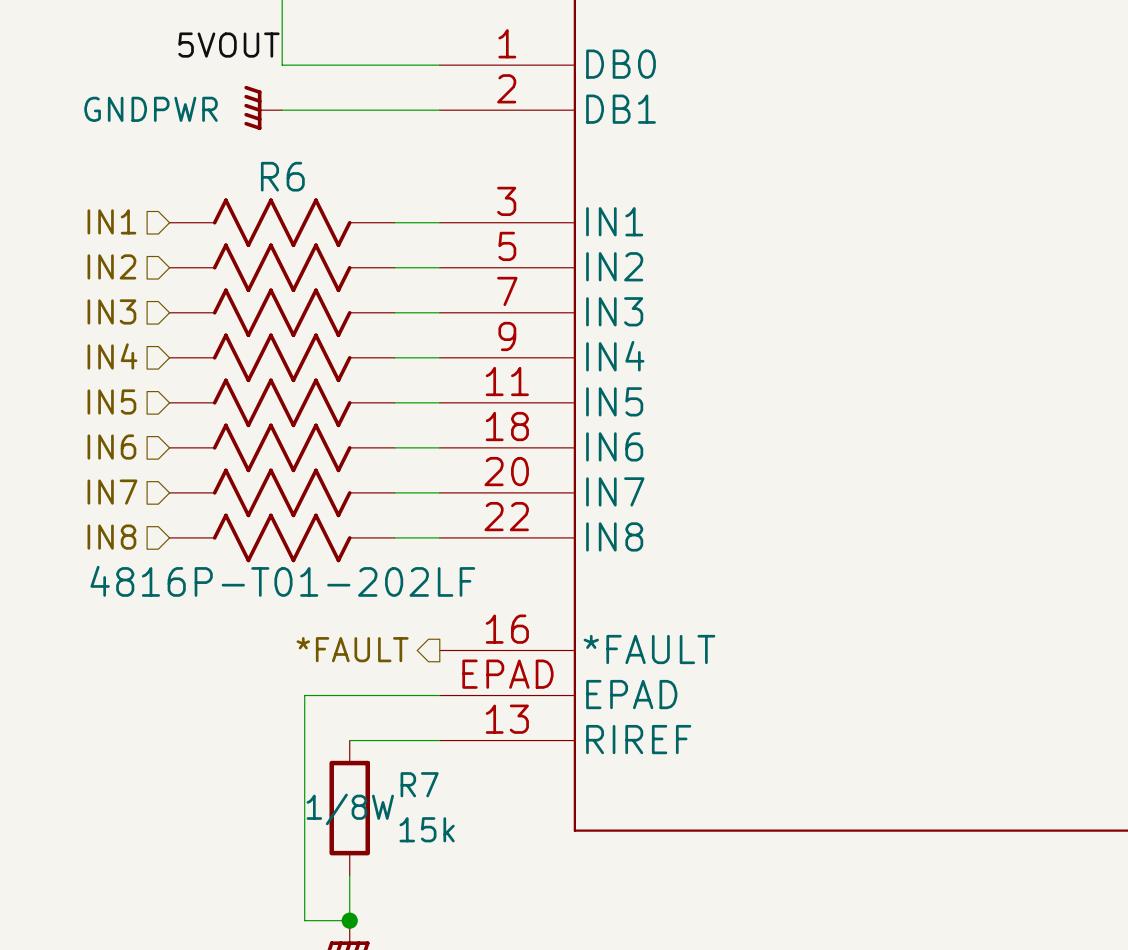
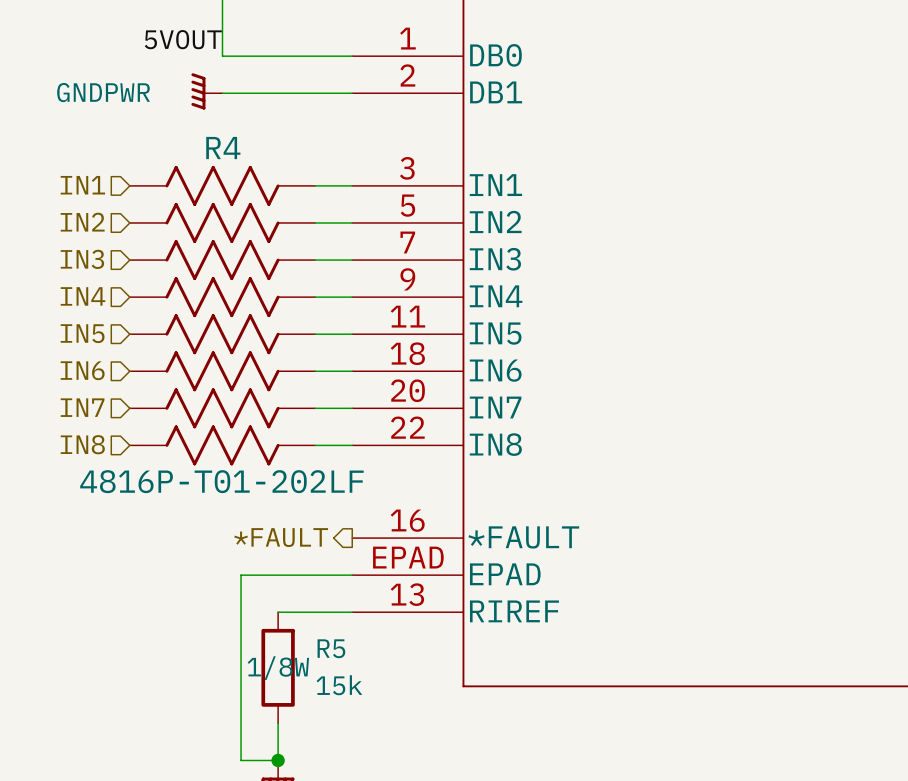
R6 name: R6 (282, 176) -> R4 (223, 148)
R7 name: R7 (419, 784) -> R5 (331, 648)

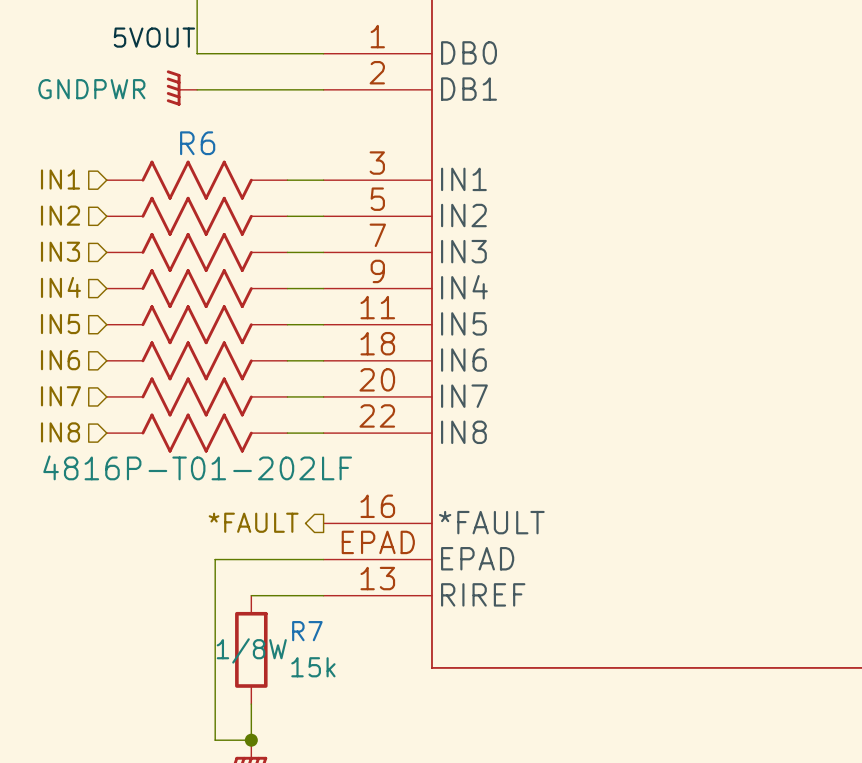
R4 name: R4 (223, 148) -> R6 (197, 143)
R5 name: R5 (331, 648) -> R7 (307, 631)

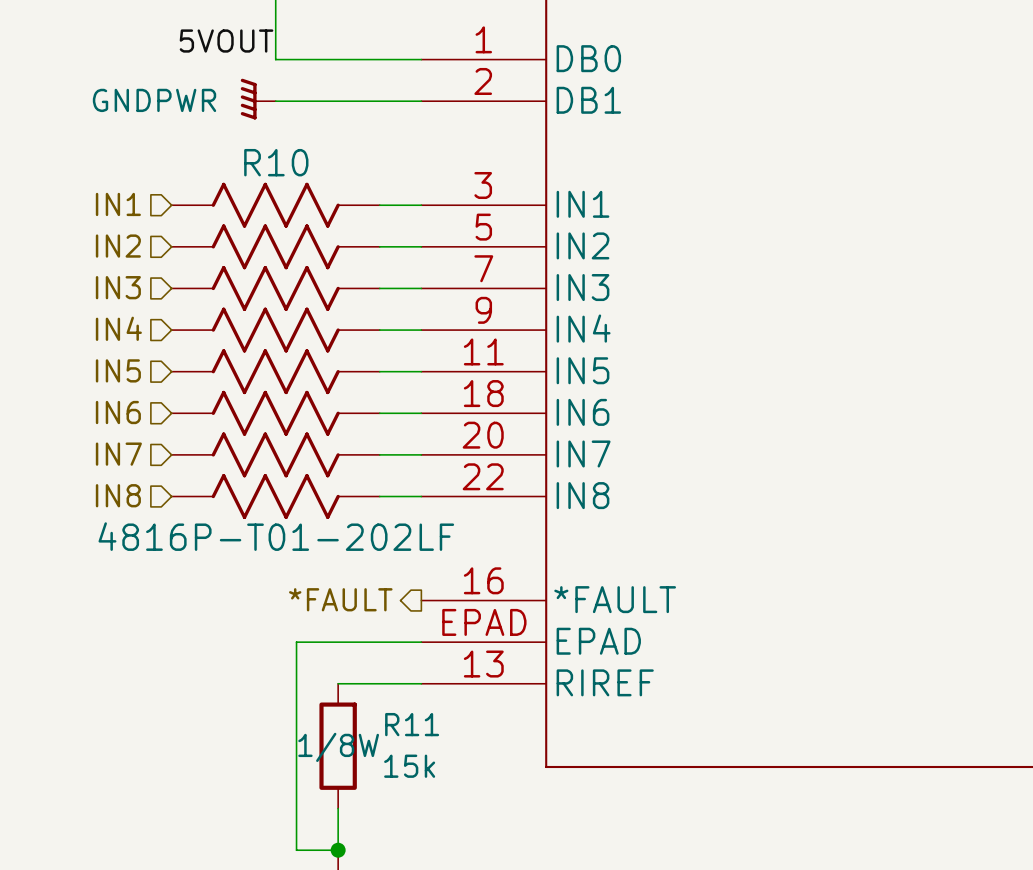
R6 name: R6 (197, 143) -> R10 (276, 162)
R7 name: R7 (307, 631) -> R11 (412, 724)

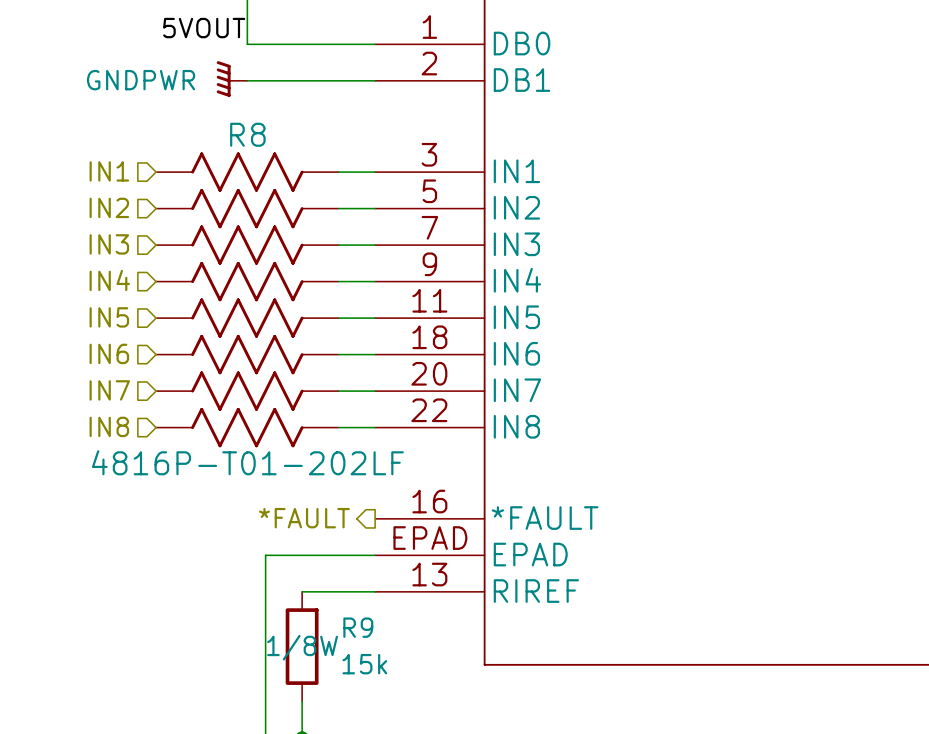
R10 name: R10 (276, 162) -> R8 (247, 134)
R11 name: R11 (412, 724) -> R9 (358, 627)

